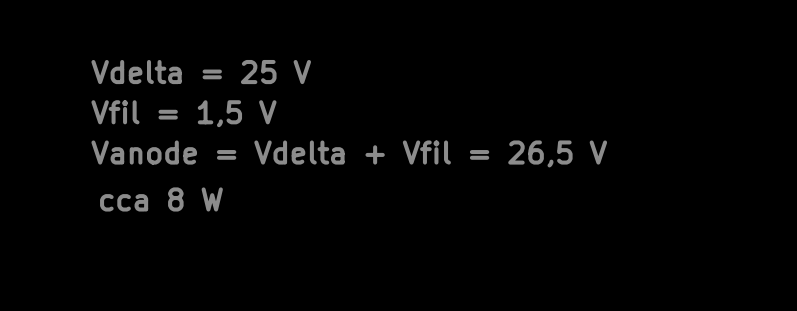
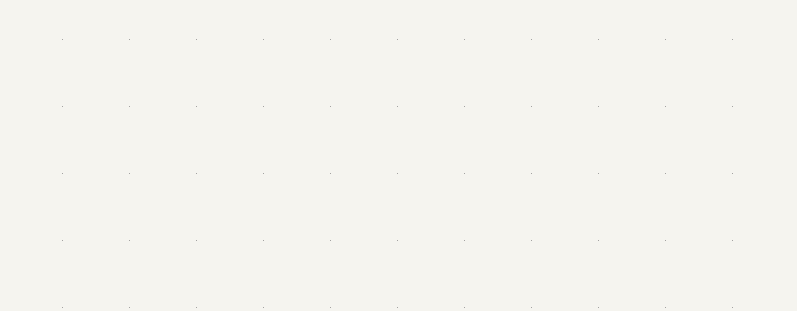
text: Vdelta = 25 V (201, 72) -> none
text: Vfil = 1,5 V (183, 113) -> none
text: Vanode = Vdelta + Vfil = 26,5 V (349, 153) -> none
text: cca 8 W (161, 199) -> none

